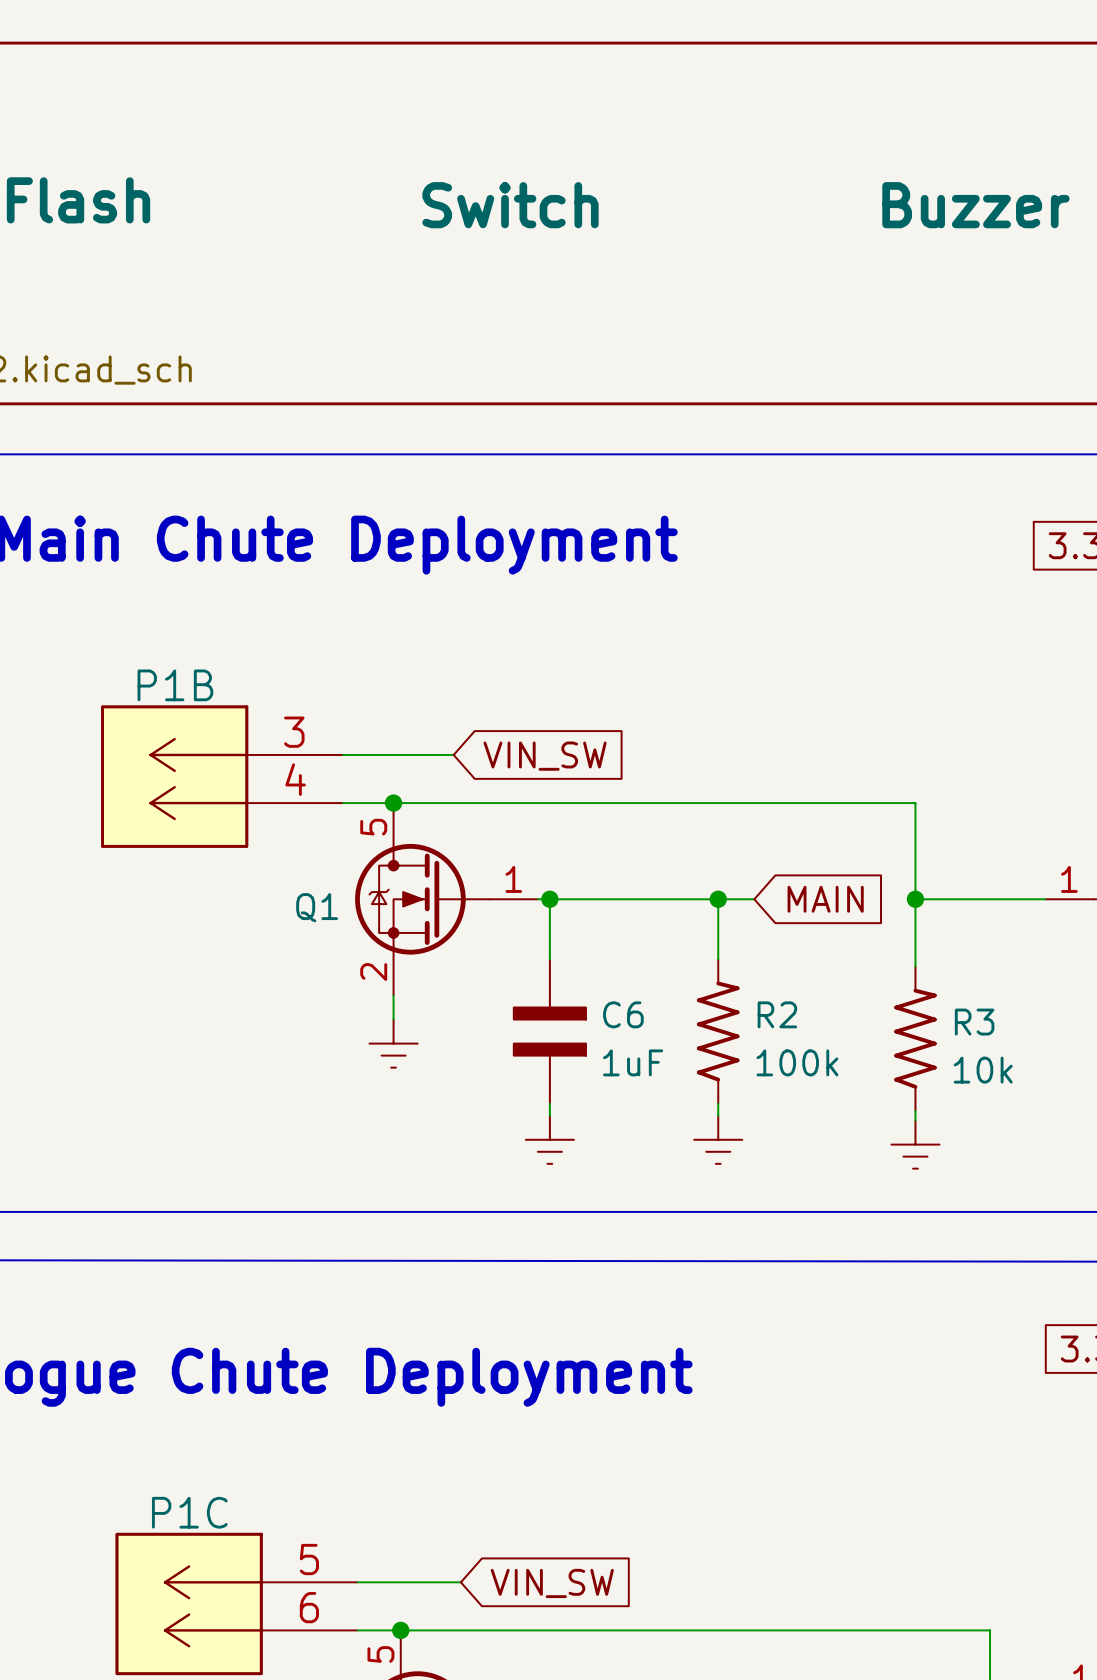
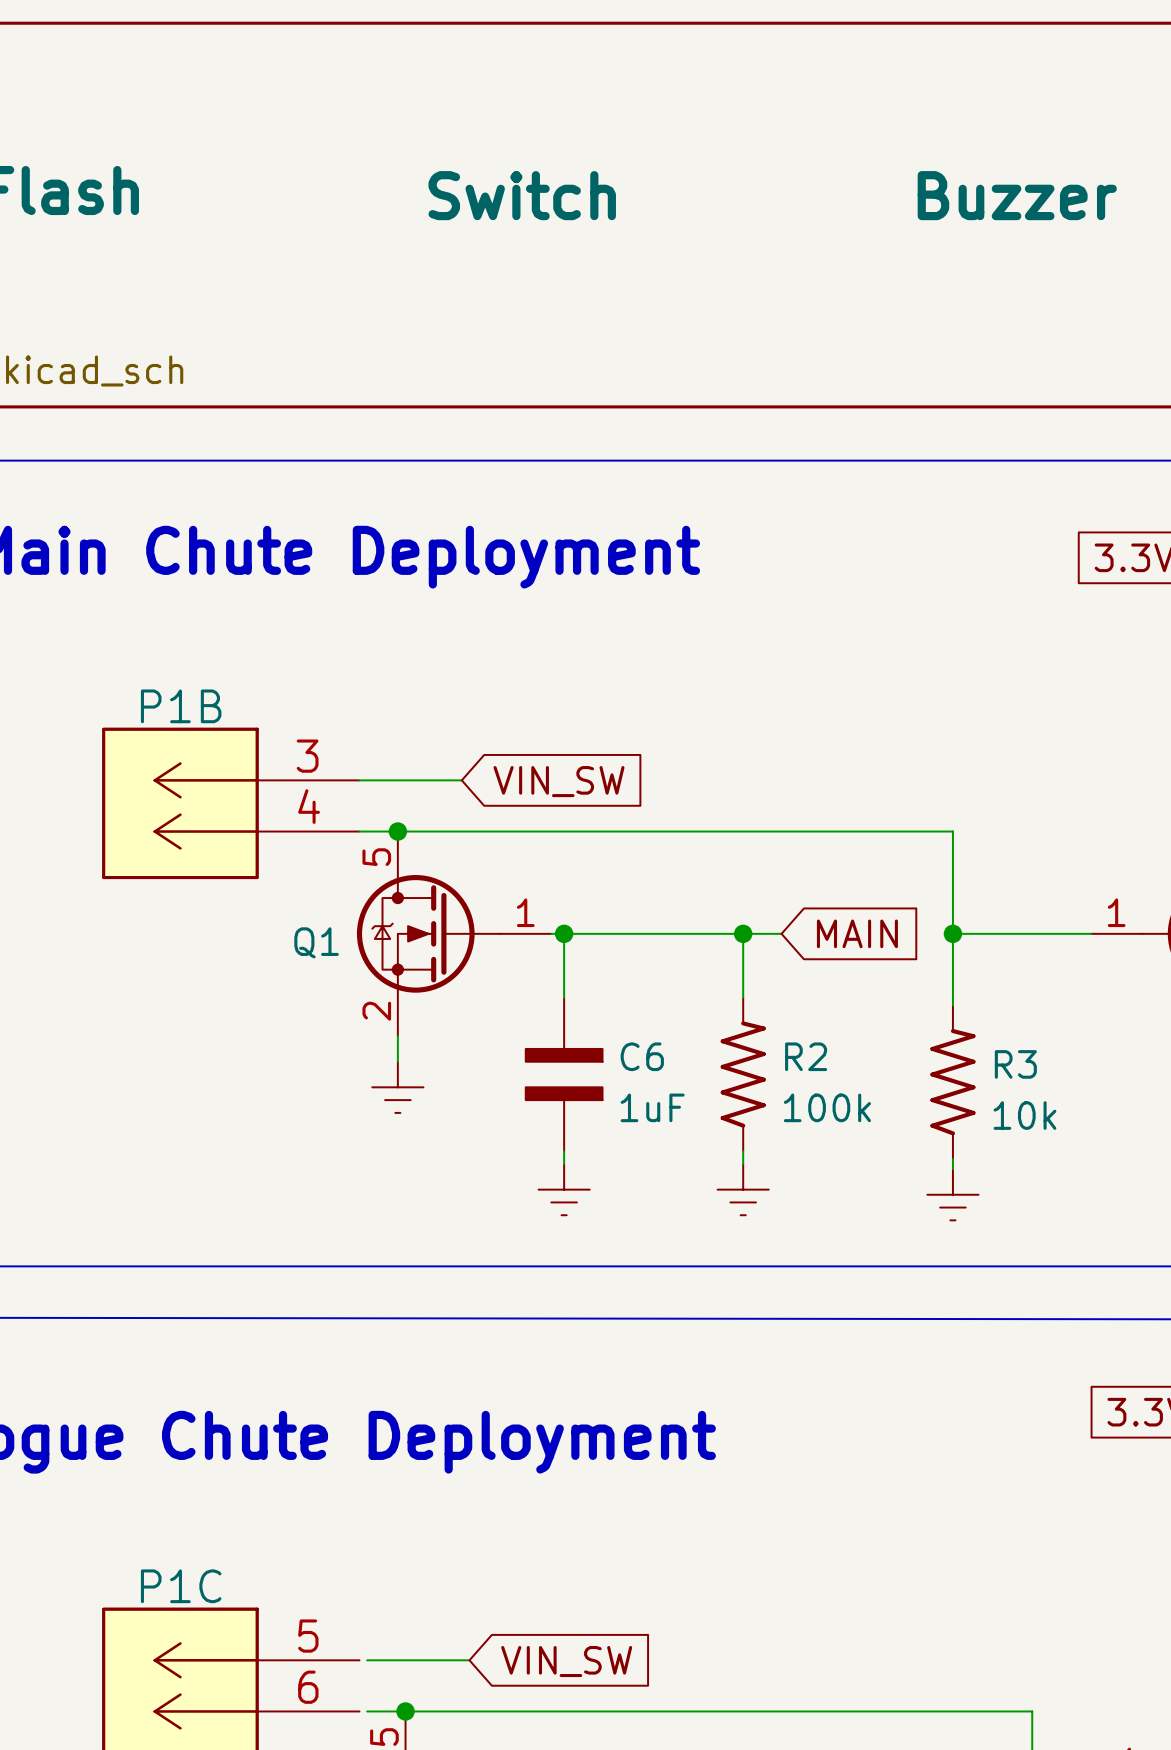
P1B position: (222, 776) -> (230, 803)
wire: (357, 1582) (364, 1582) -> none
wire: (357, 1630) (364, 1630) -> none

